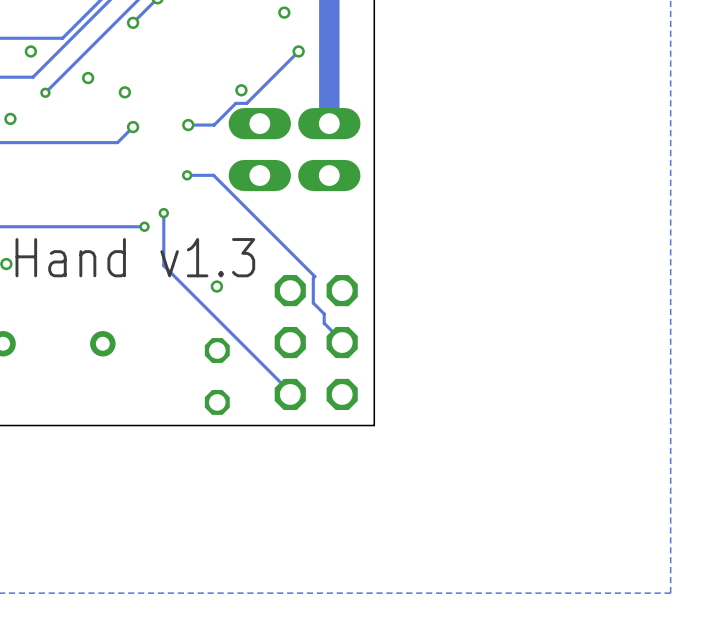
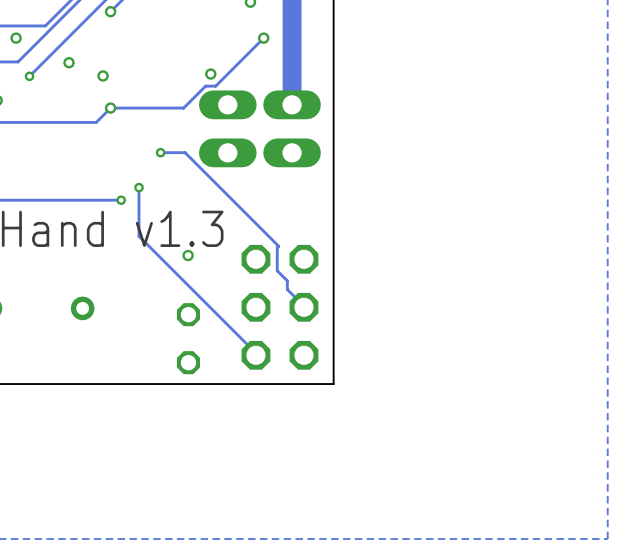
via: (188, 125) -> none
track: (214, 125) (188, 125) -> (185, 106) (183, 108) (110, 108)

